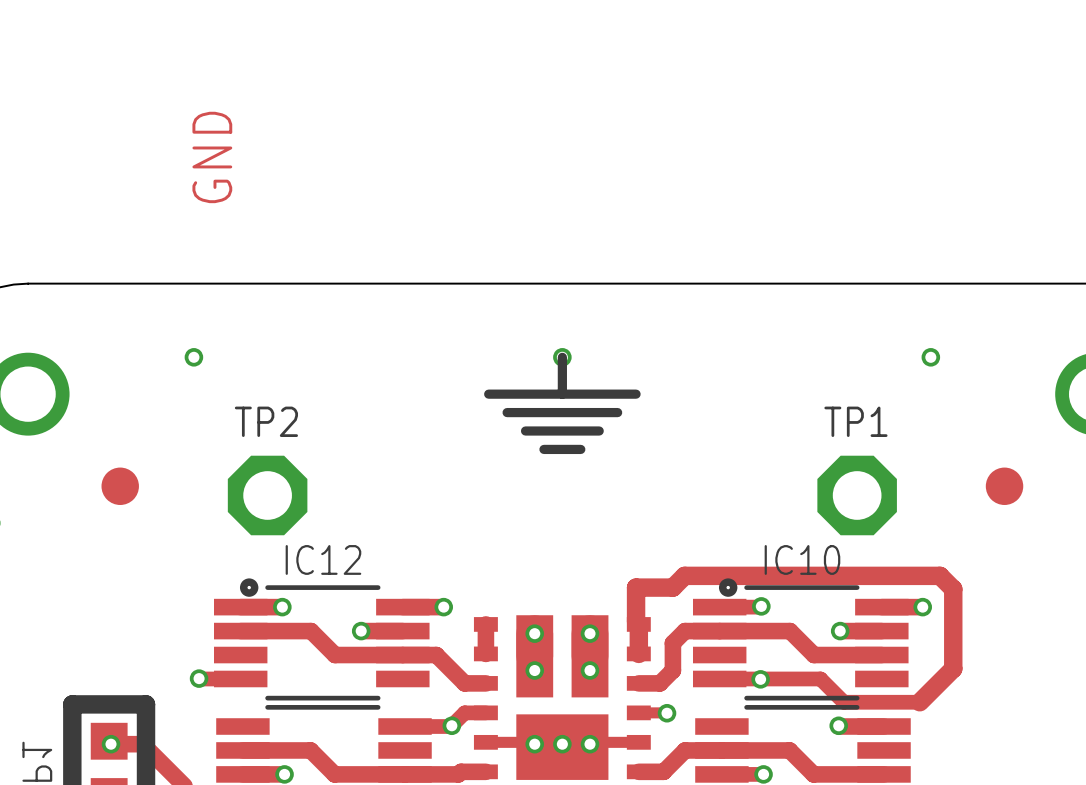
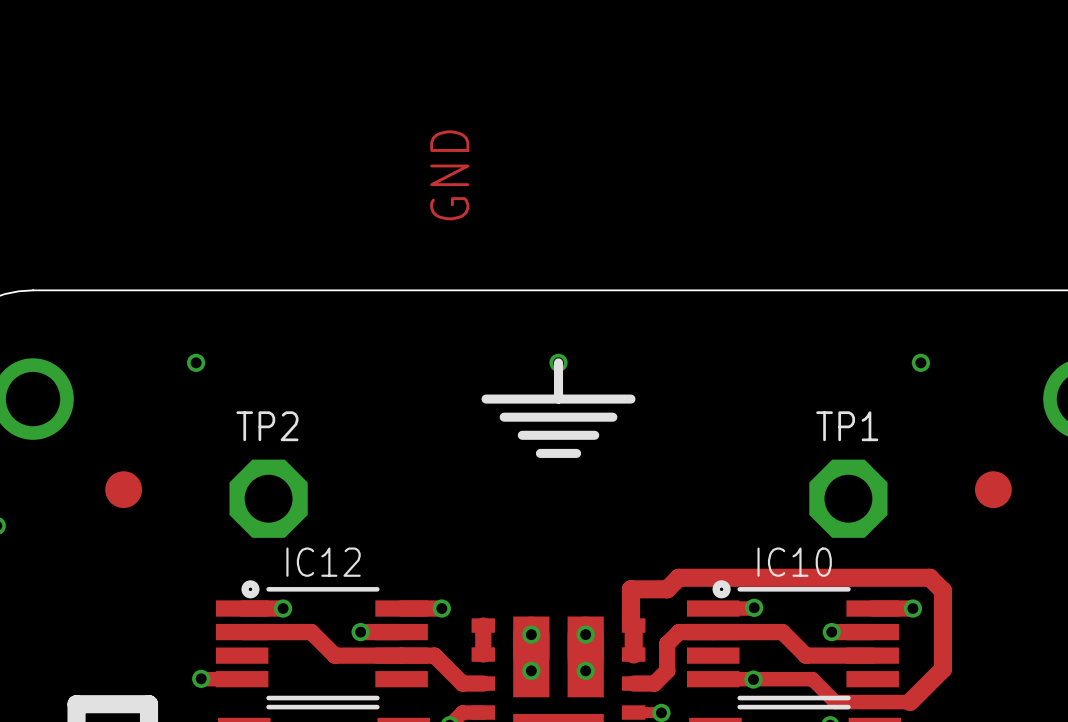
text position: GND (212, 157) -> GND (449, 175)

